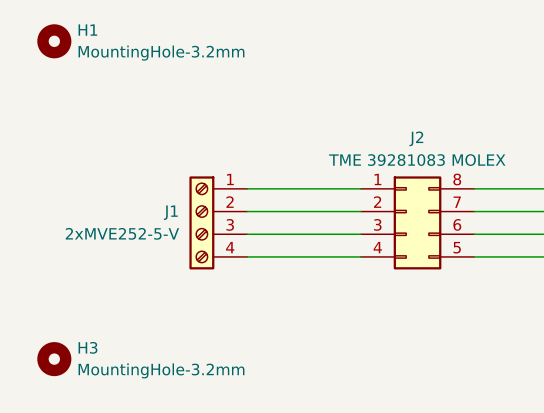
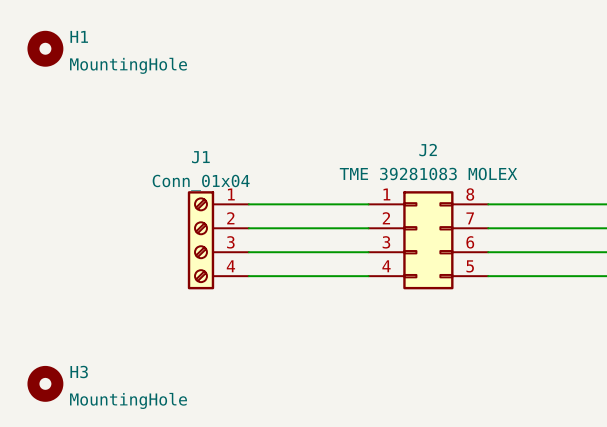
H1 value: MountingHole-3.2mm (161, 53) -> MountingHole (128, 65)
J1 name position: J1 (170, 212) -> J1 (200, 157)
J1 value: 2xMVE252-5-V (122, 233) -> Conn_01x04 (201, 182)
H3 value: MountingHole-3.2mm (161, 370) -> MountingHole (128, 400)

